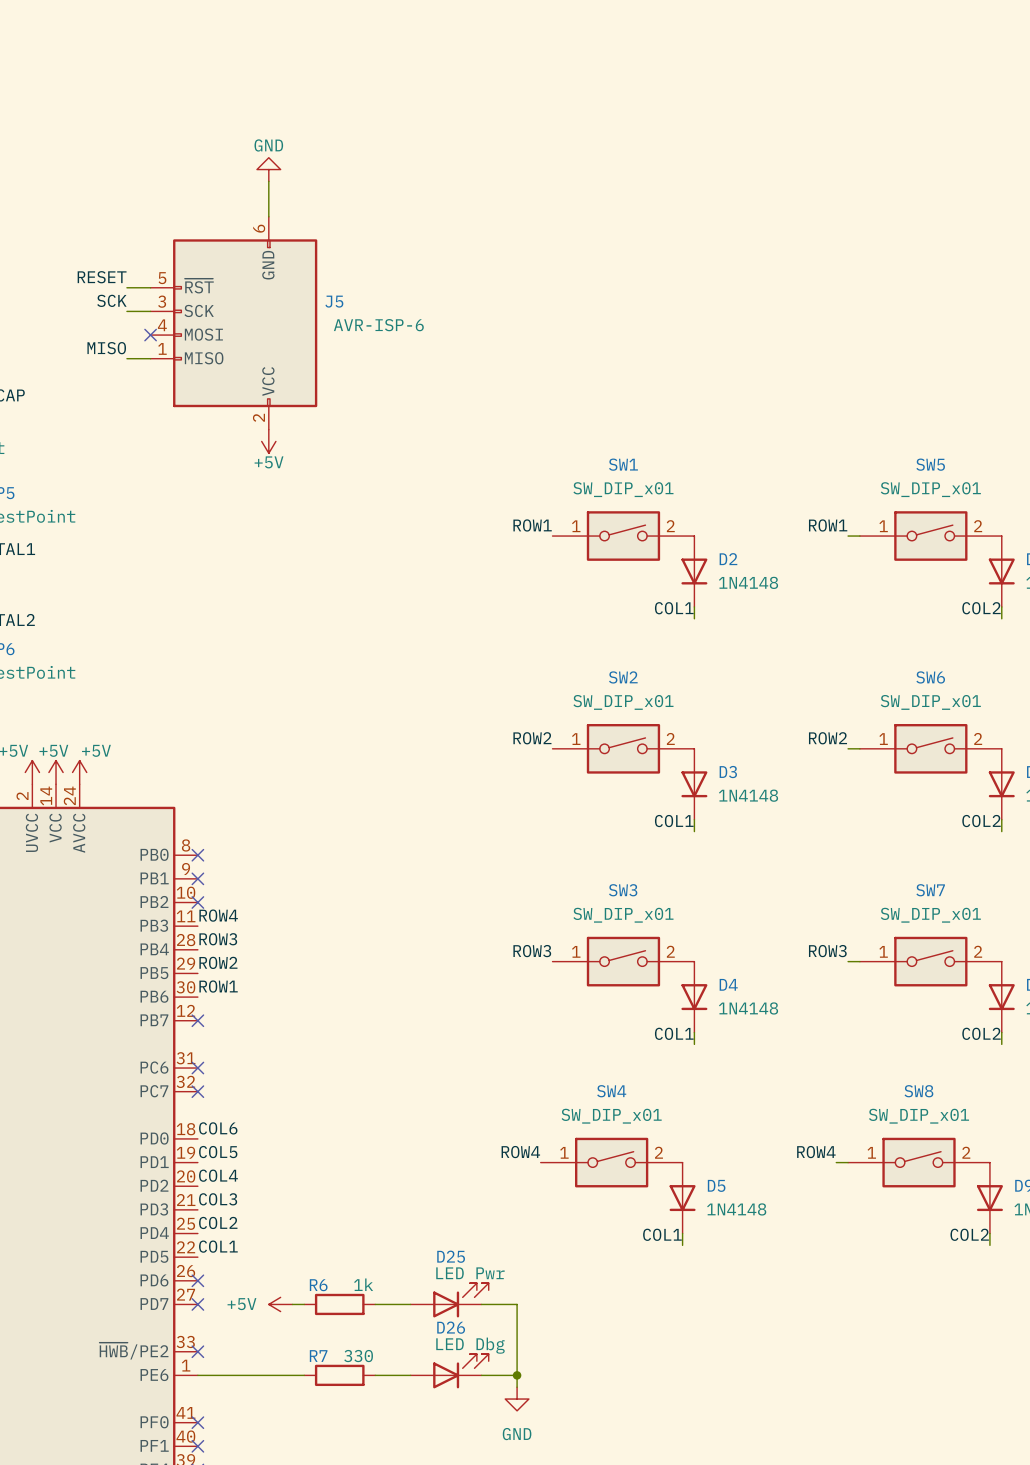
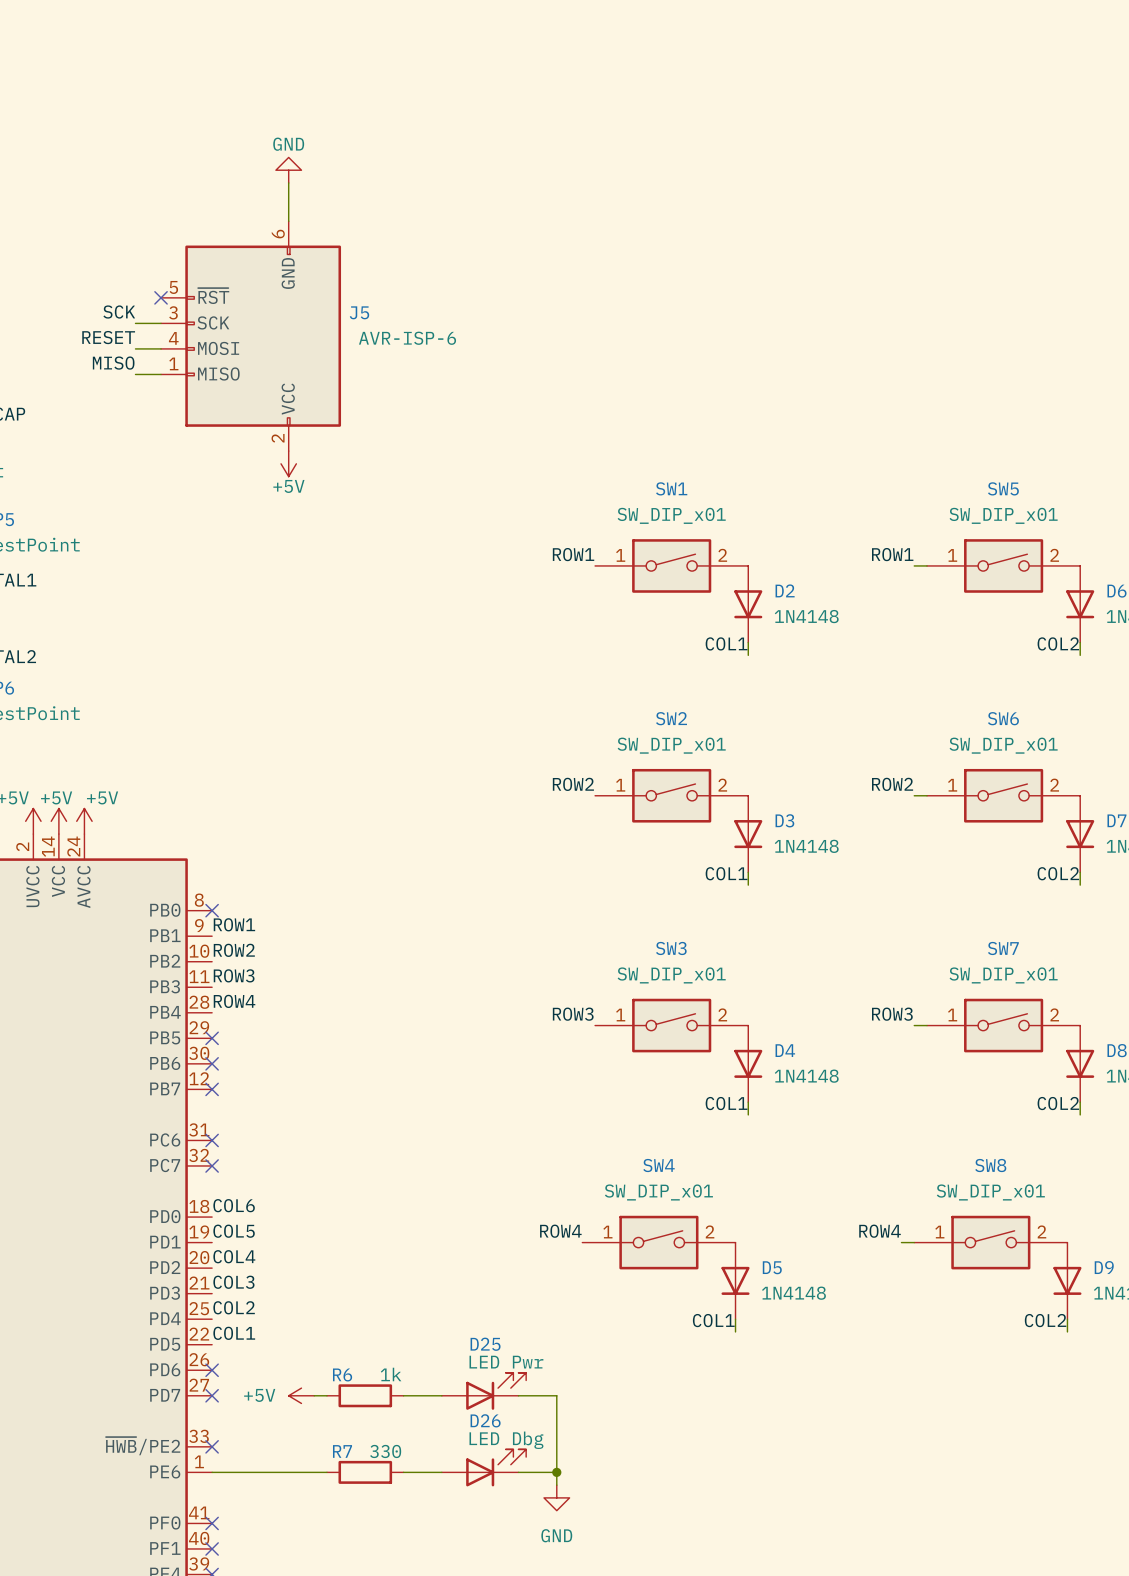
label position: RESET (102, 277) -> RESET (108, 337)
wire: (126, 287) (150, 287) -> (135, 348) (161, 348)
no-connect mark position: (150, 335) -> (161, 297)
no-connect mark: (197, 878) -> none
no-connect mark: (197, 902) -> none
label: ROW4 (218, 915) -> ROW3 (234, 975)
label: ROW3 (218, 939) -> ROW4 (234, 1001)
label position: ROW2 (218, 962) -> ROW2 (234, 950)
no-connect mark: none -> (212, 1038)
label position: ROW1 (218, 986) -> ROW1 (234, 924)
no-connect mark: none -> (212, 1063)

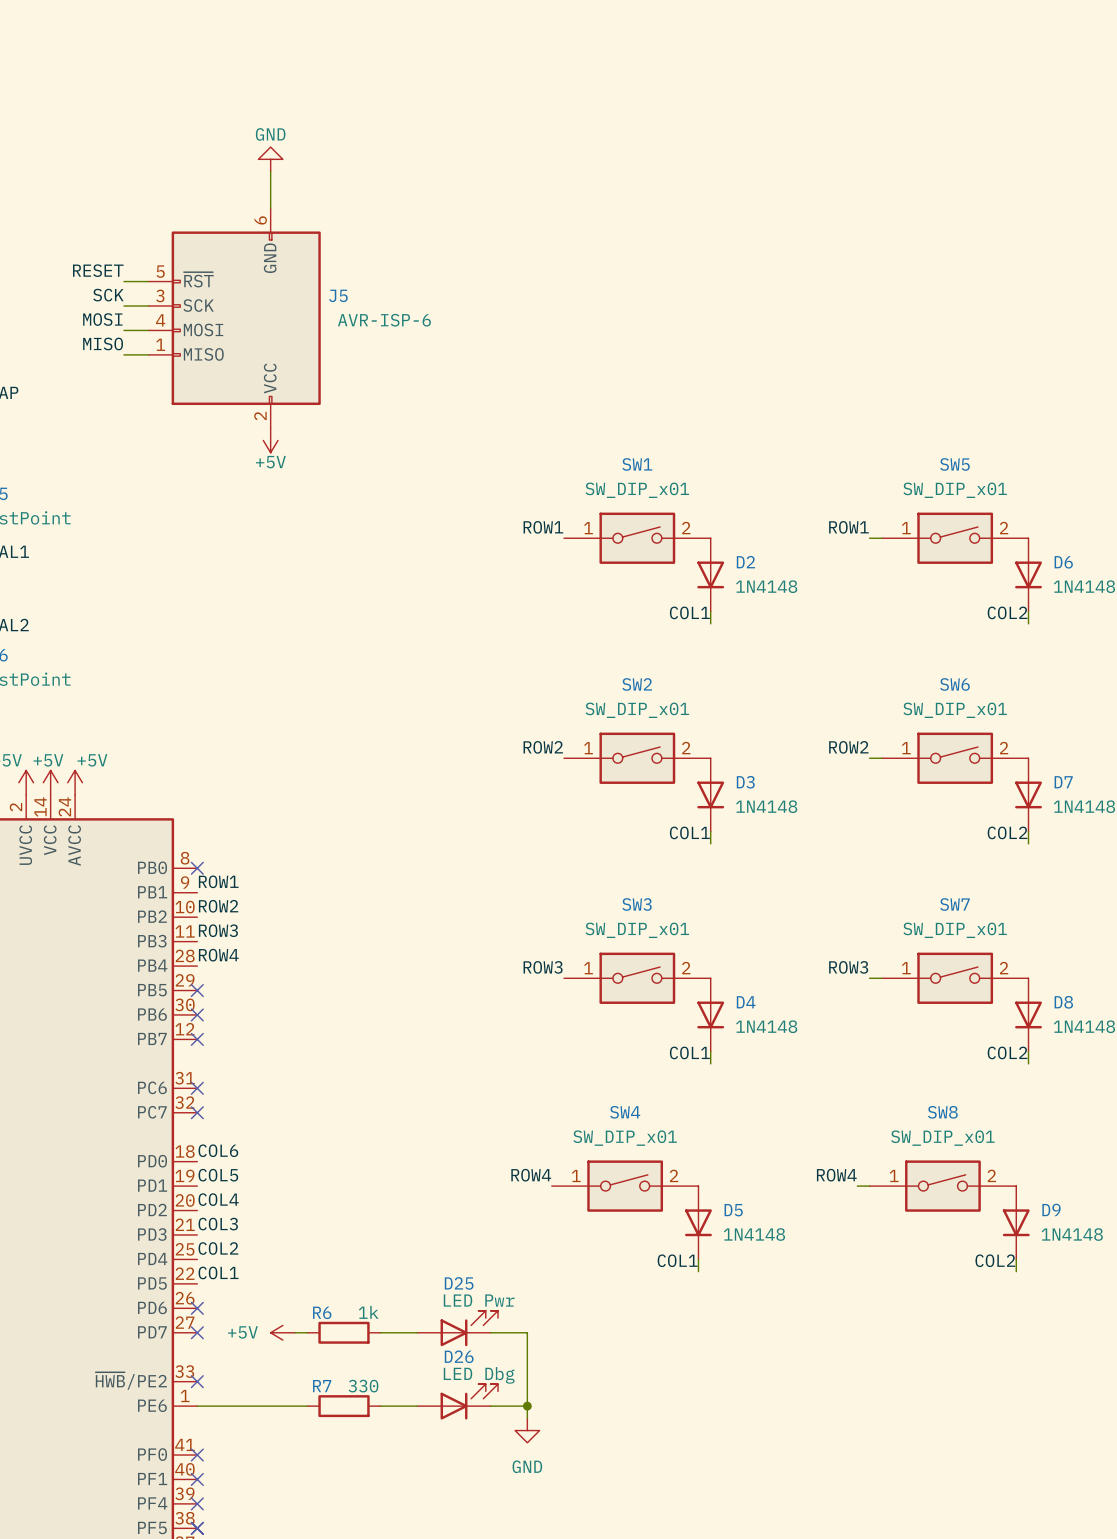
label: none -> RESET (98, 270)
wire: none -> (123, 281) (148, 281)
no-connect mark: (161, 297) -> none
label: RESET (108, 337) -> MOSI (102, 319)

